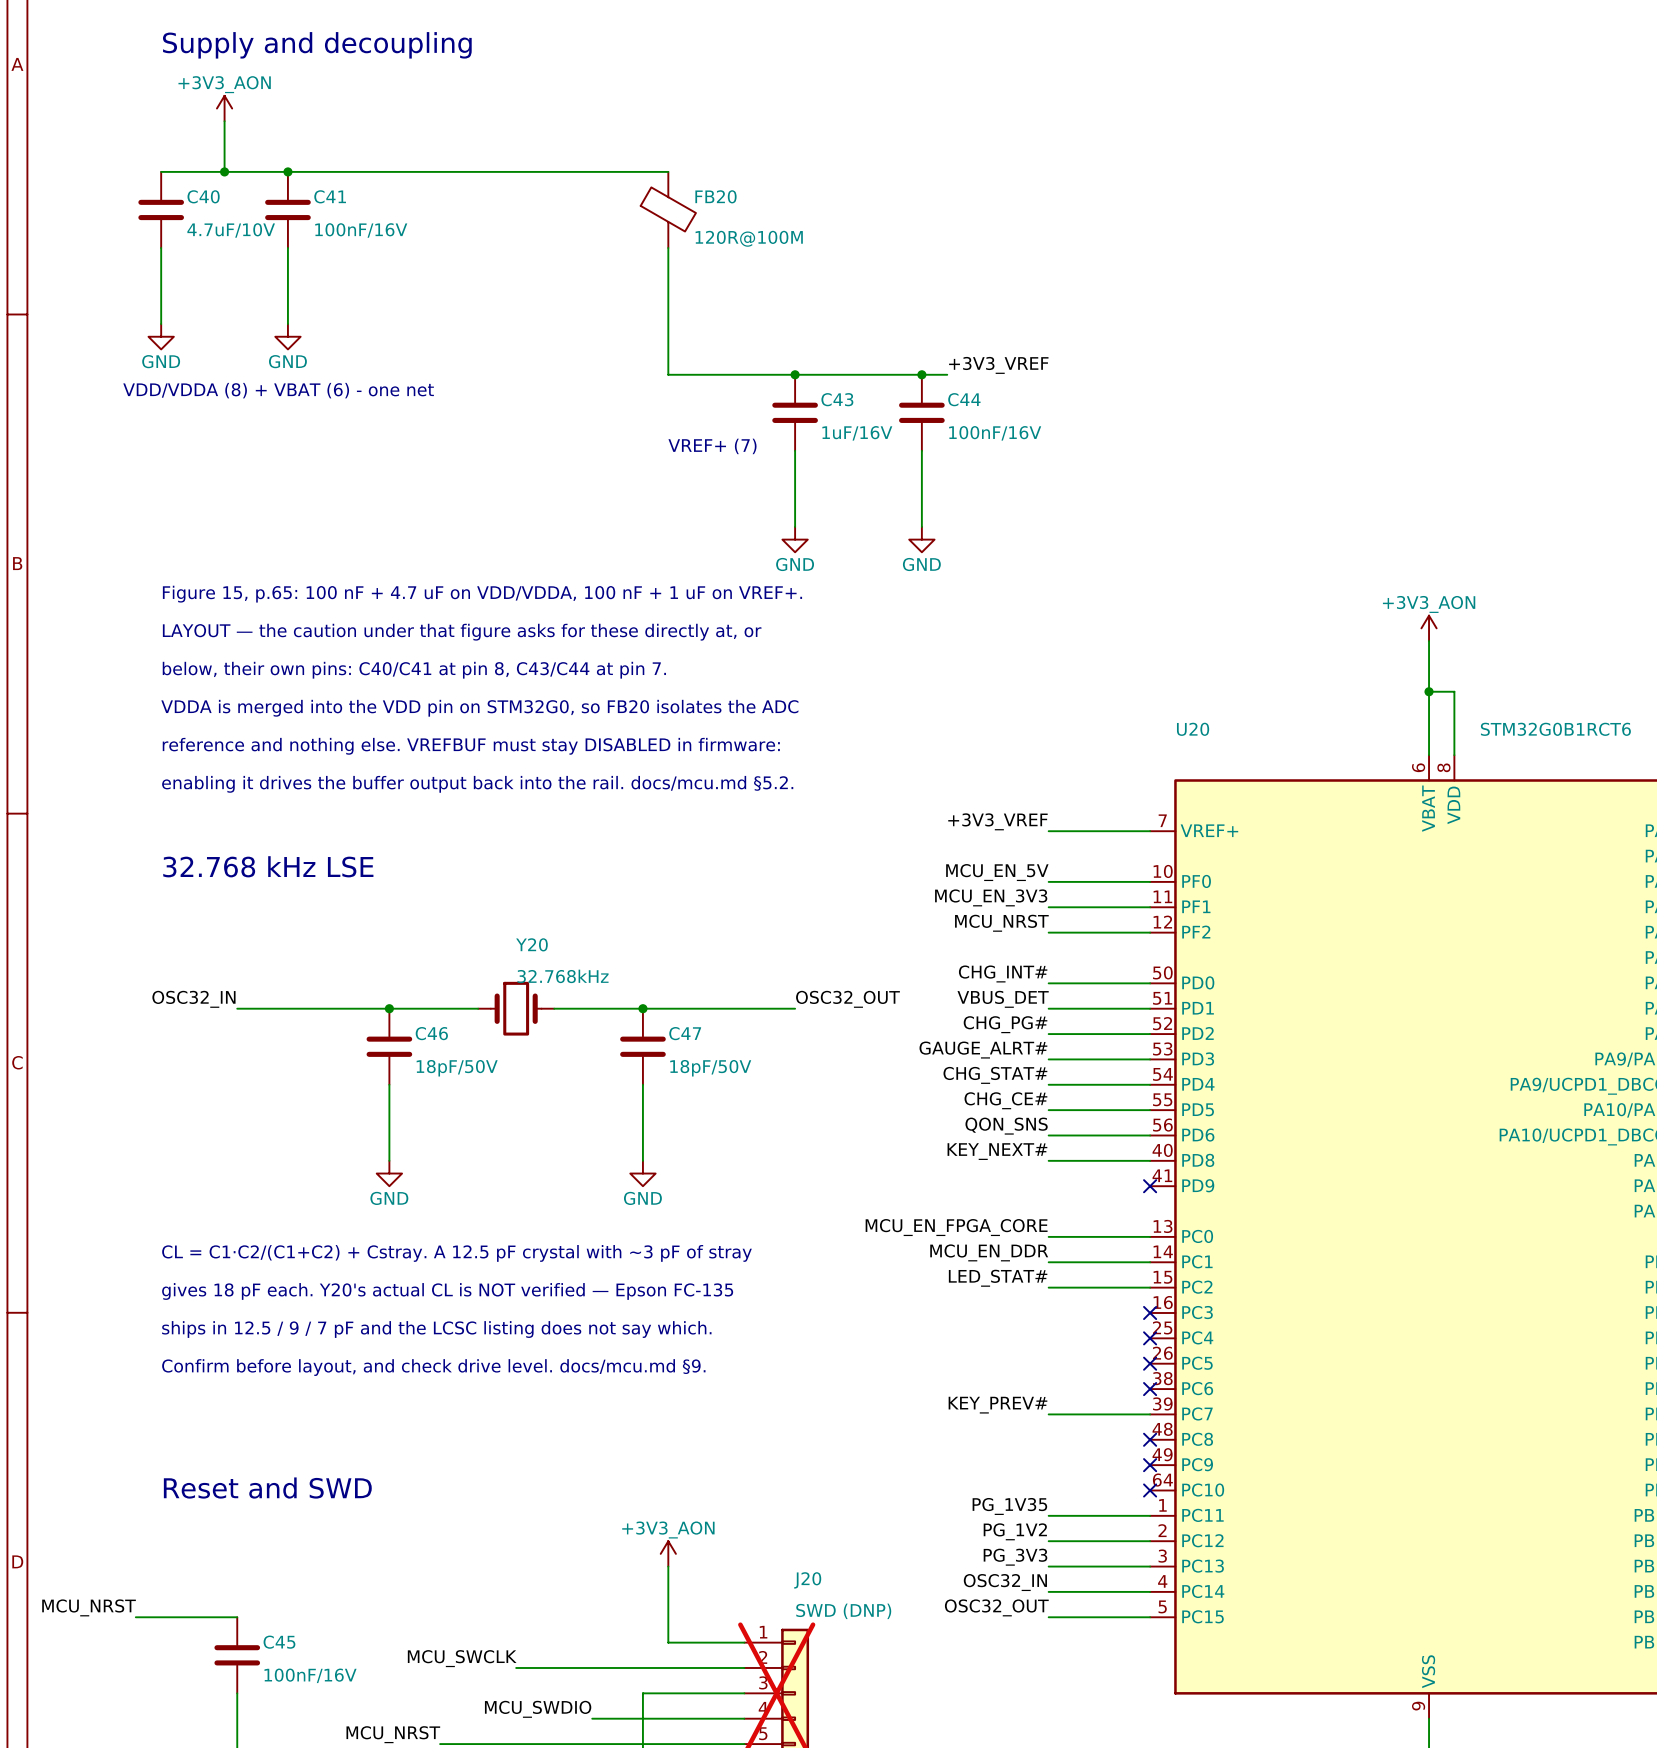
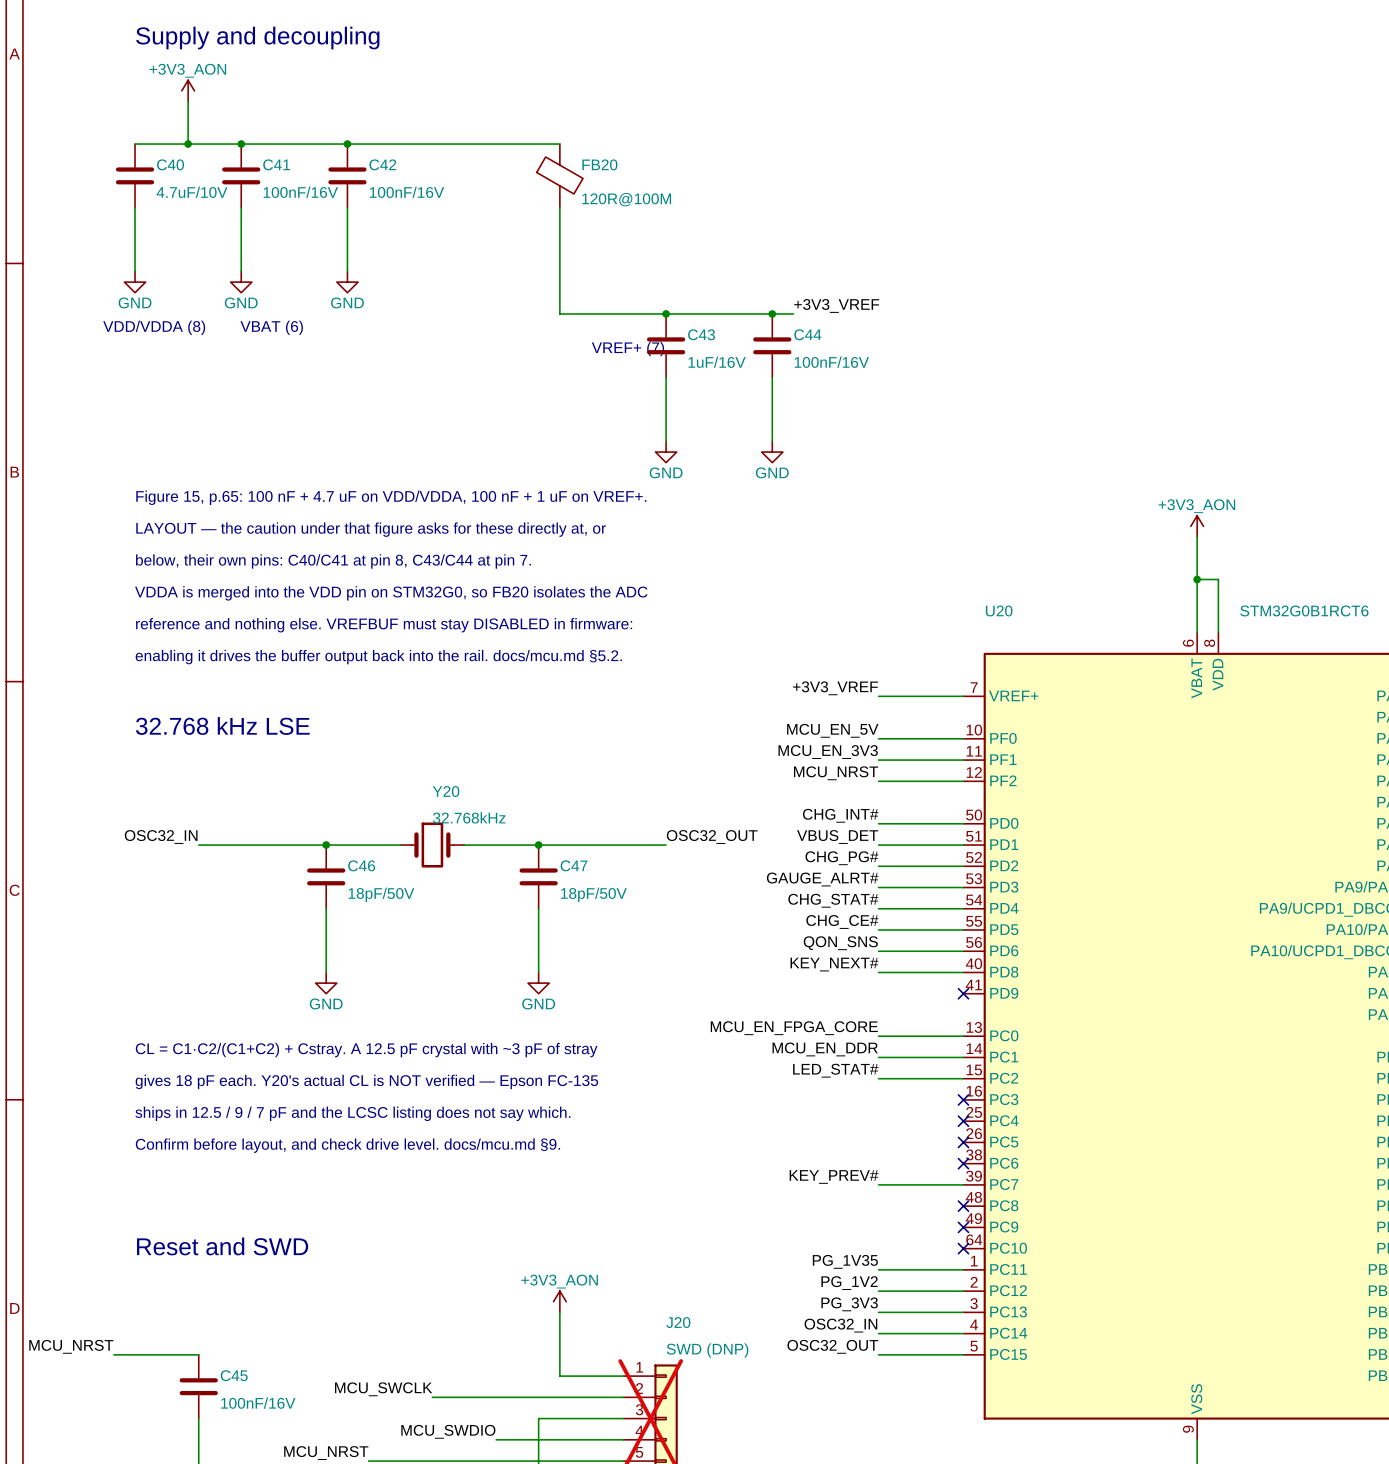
junction: none -> (347, 144)
C42: none -> 100nF/16V (347, 175)
wire: none -> (347, 207) (347, 271)
power symbol: none -> GND (347, 282)
text: VDD/VDDA (8) + VBAT (6) - one net (278, 390) -> VDD/VDDA (8) VBAT (6) (203, 327)
text position: VREF+ (7) (712, 446) -> VREF+ (7) (627, 349)

